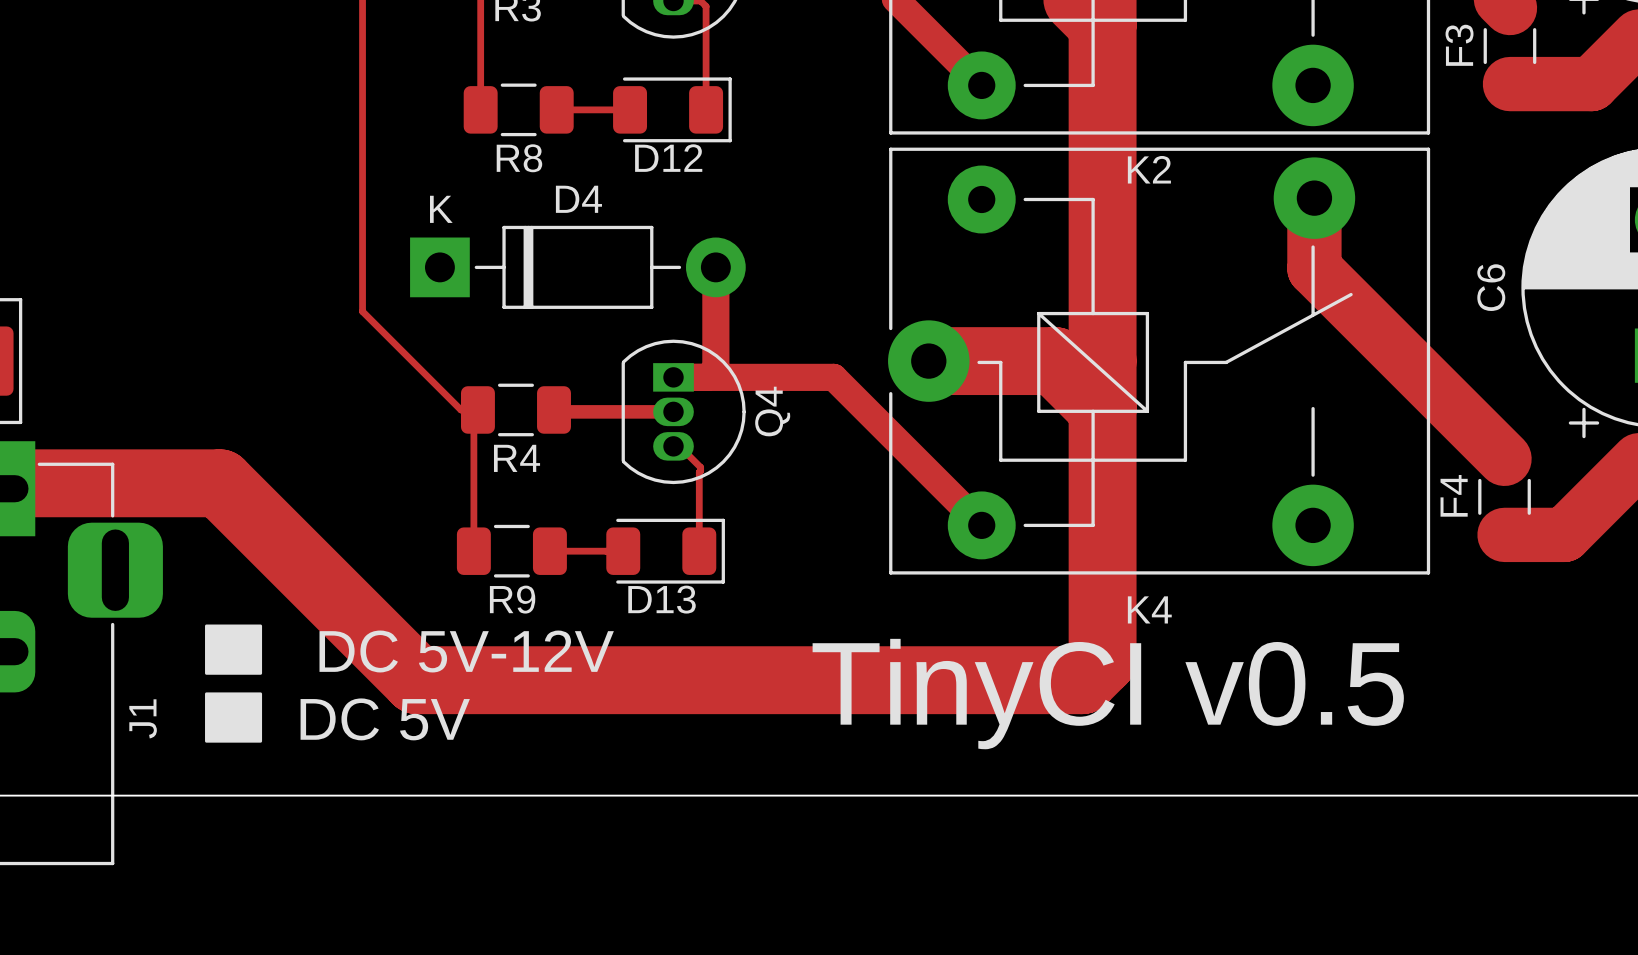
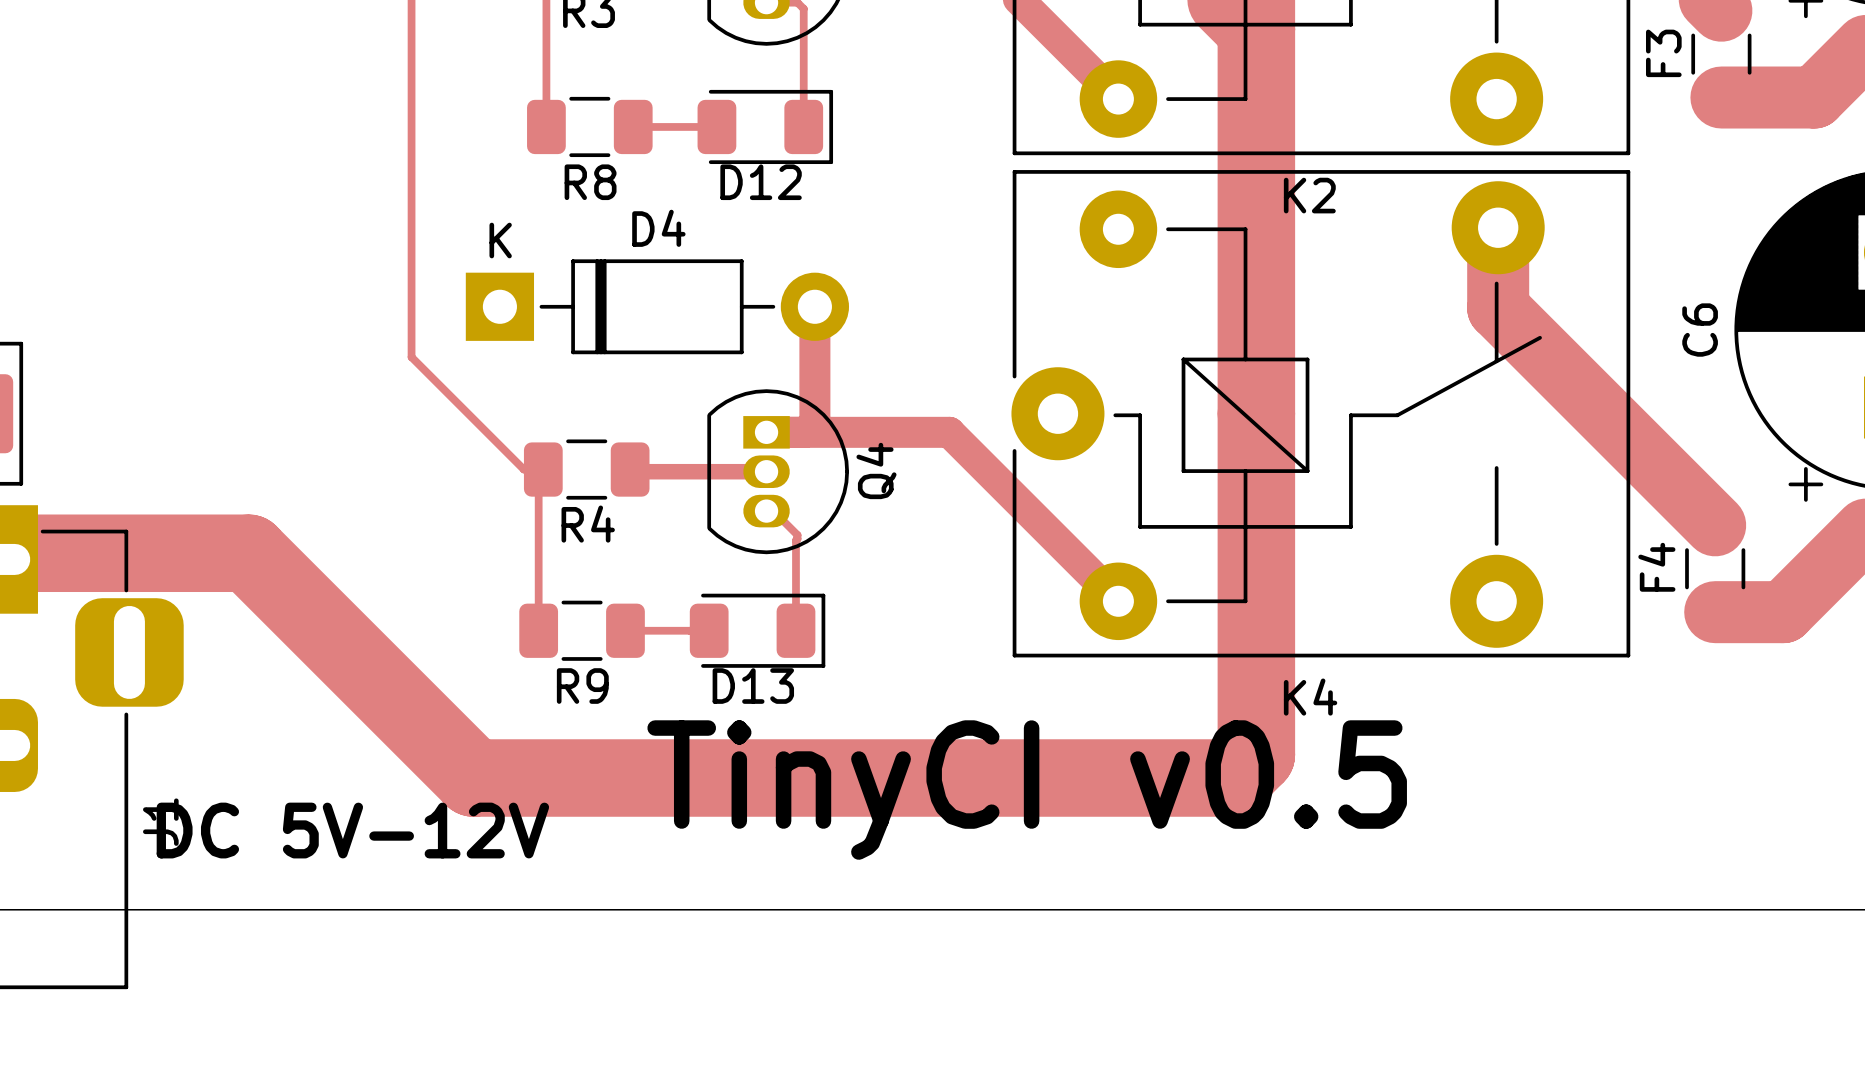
track: (928, 361) (1055, 361) (1102, 408) -> none
drawing: [205, 624, 263, 743] -> none
text position: DC 5V-12V (466, 651) -> DC 5V-12V (352, 830)
text position: TinyCI v0.5 (1108, 694) -> TinyCI v0.5 (1027, 790)
text: DC 5V (385, 719) -> none

